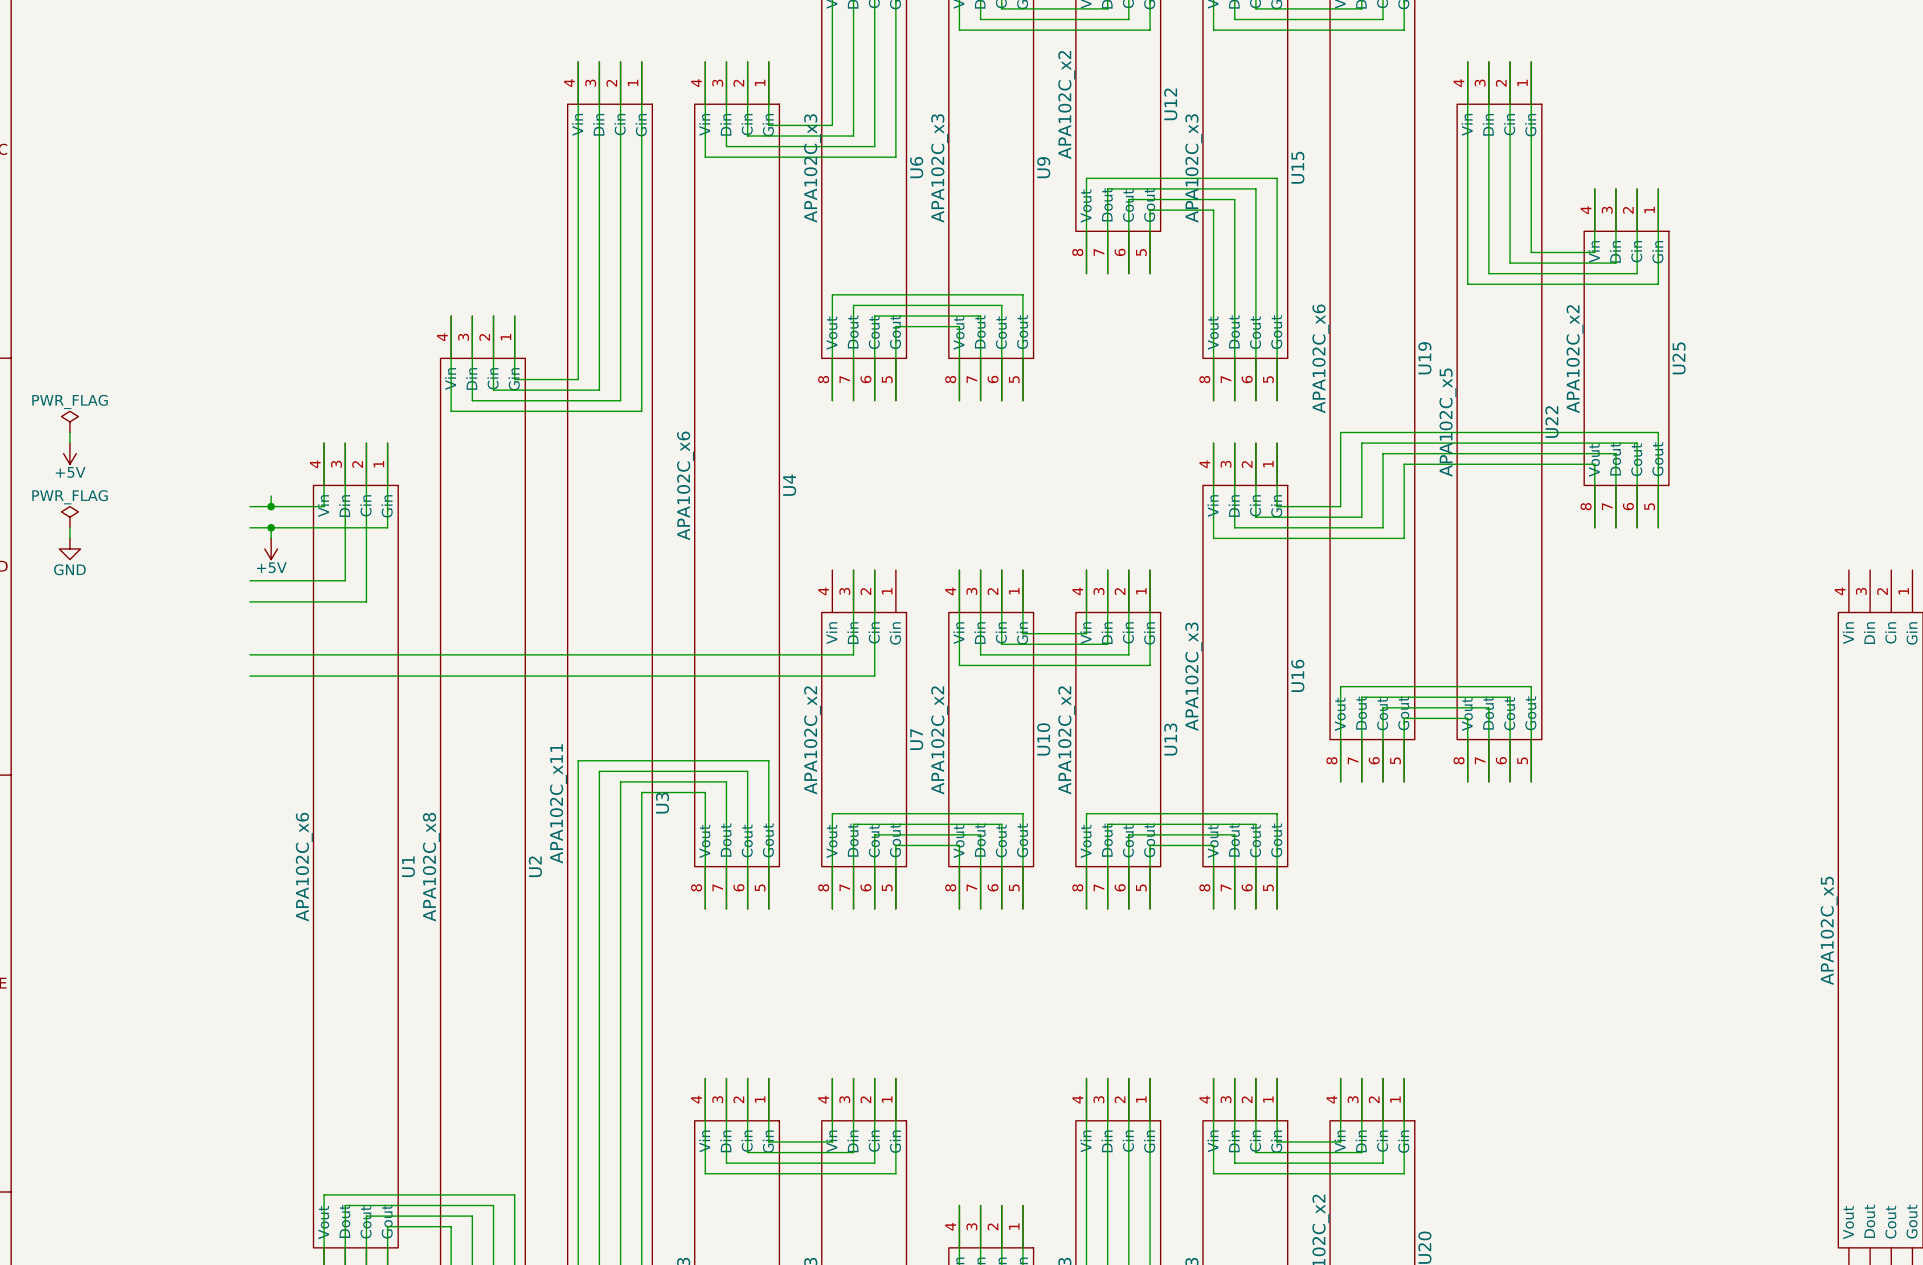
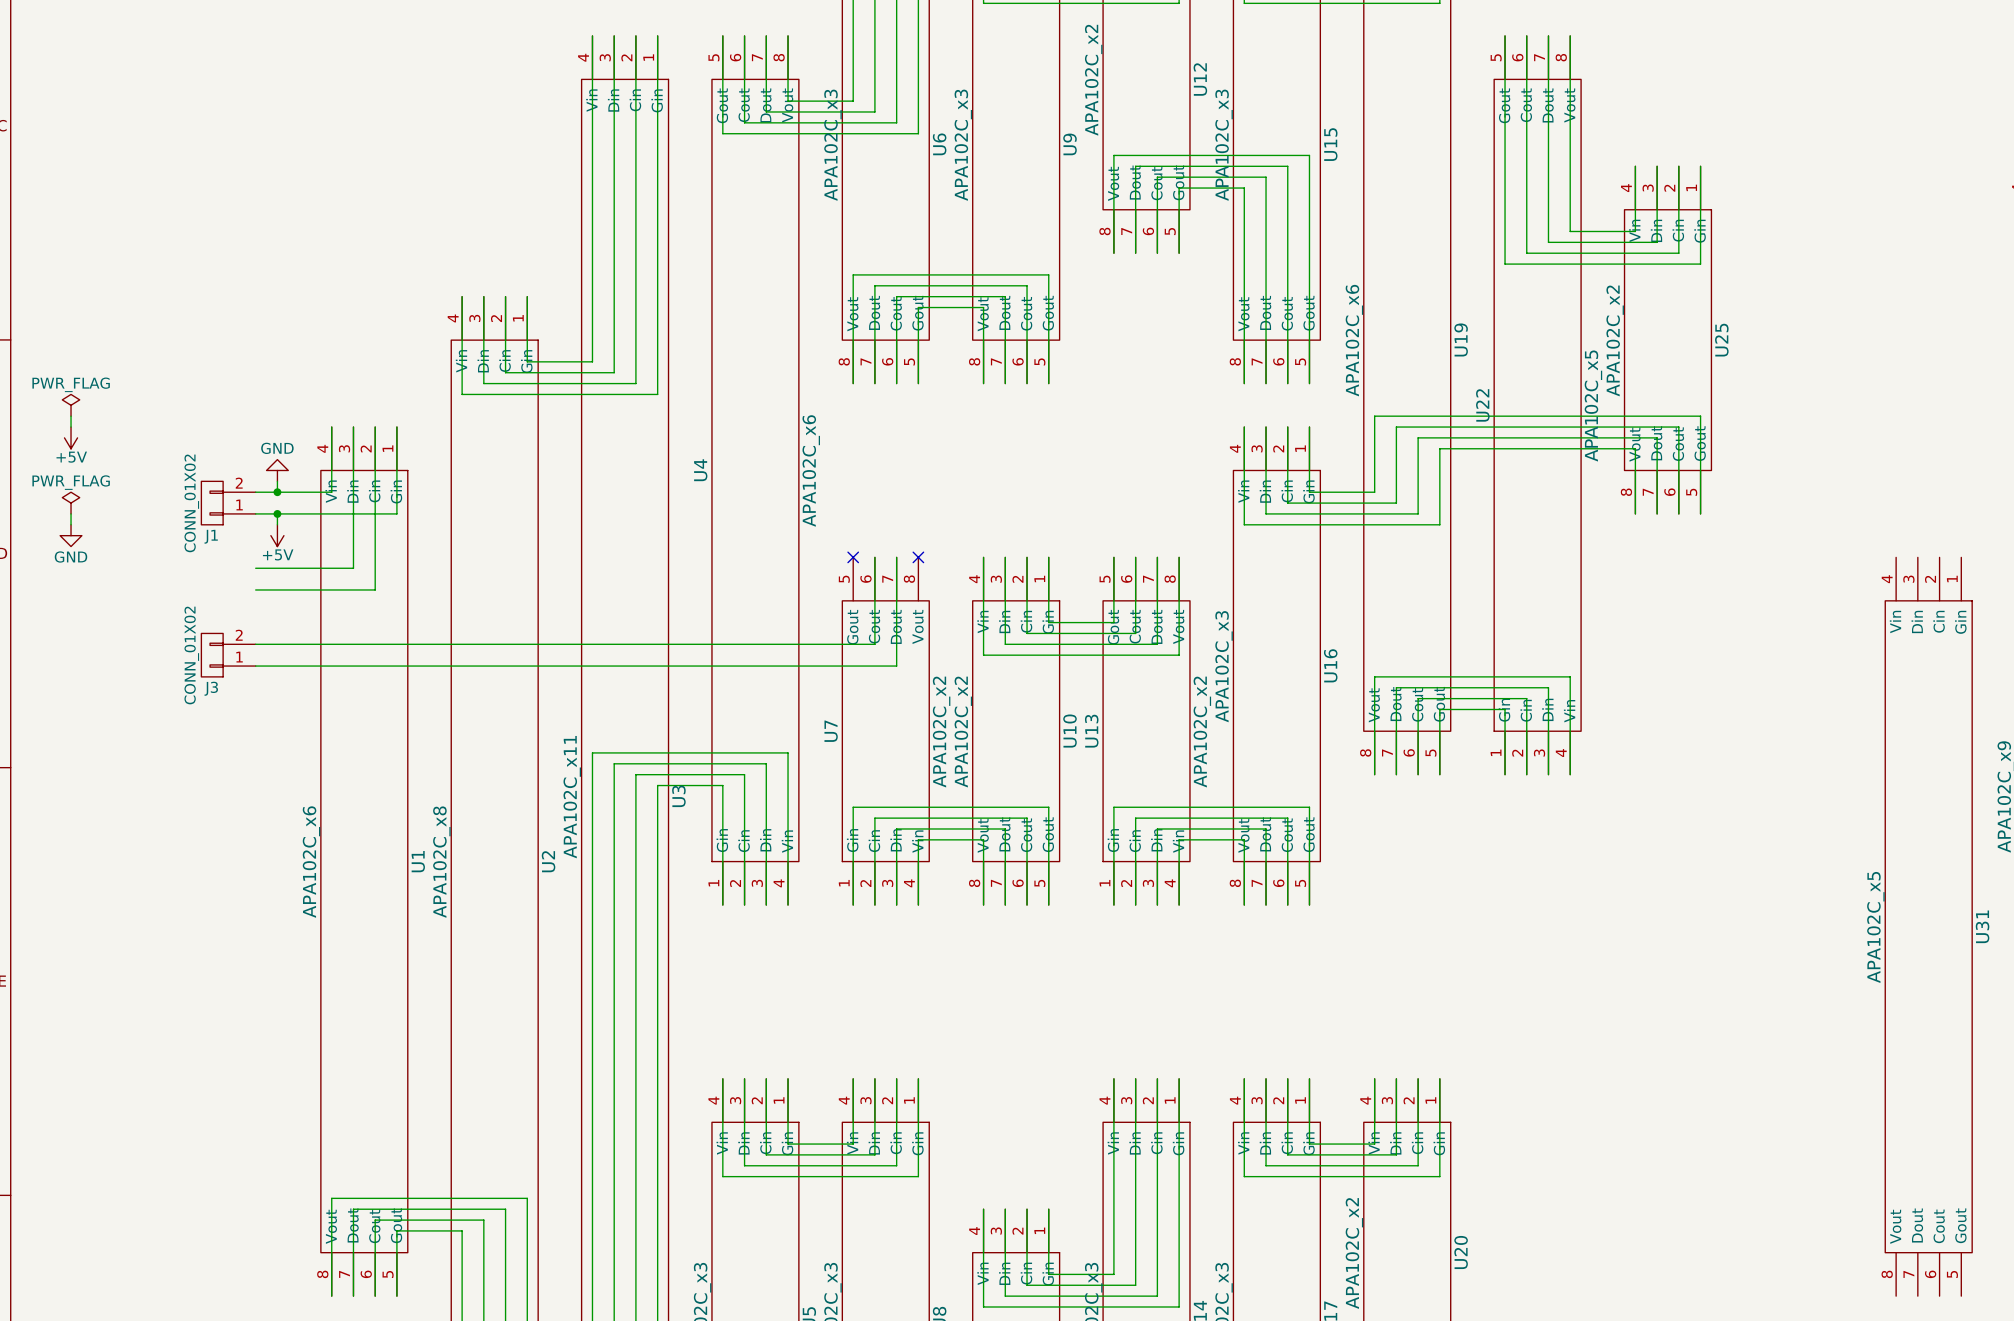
U22 rotation: 0° (1499, 421) -> 180° (1537, 405)
power symbol: none -> GND (277, 470)
U4 rotation: 0° (737, 485) -> 180° (755, 470)
J1: none -> CONN_01X02 (228, 503)
no-connect mark: none -> (853, 557)
no-connect mark: none -> (918, 557)
J3: none -> CONN_01X02 (228, 655)
U7 rotation: 0° (864, 739) -> 180° (885, 731)
U13 rotation: 0° (1118, 739) -> 180° (1146, 731)

